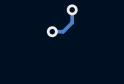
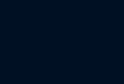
track: (72, 9) (72, 22) (63, 31) (52, 31) -> none
via: (72, 9) -> none
via: (52, 31) -> none

